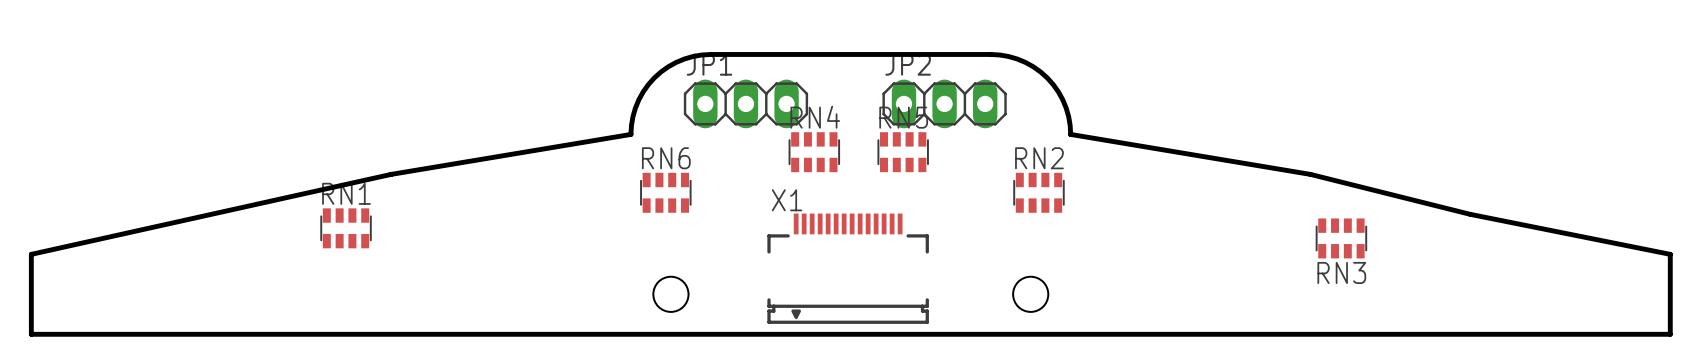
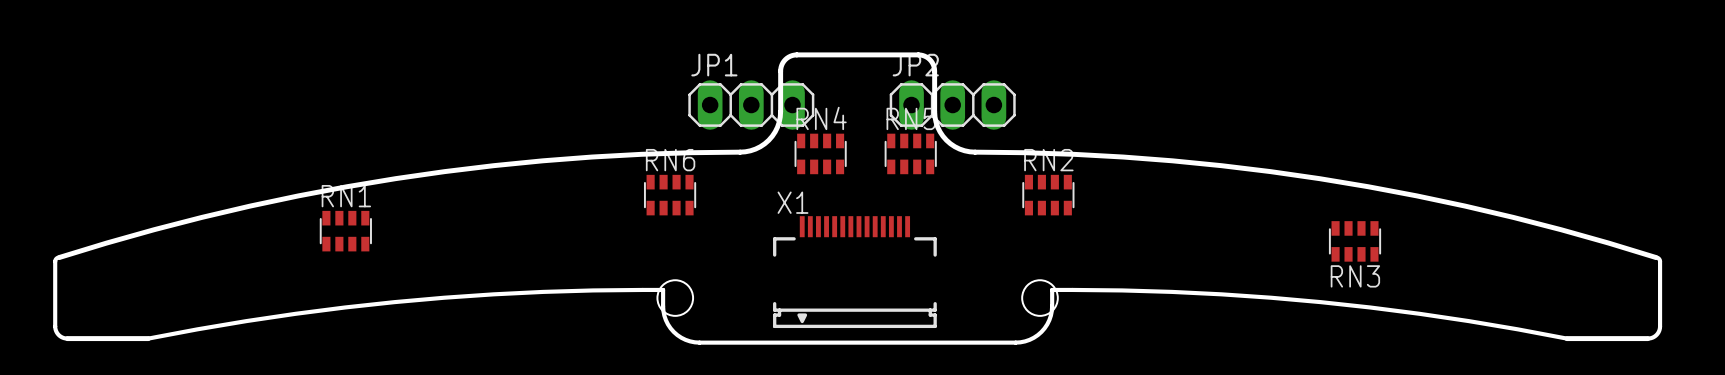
board edge: (790, 54) (701, 54) (676, 62) (661, 71) (643, 91) (635, 108) (630, 134) (391, 174) (31, 254) (31, 334) (71, 334) -> (796, 54) (786, 58) (781, 66) (780, 111) (777, 127) (768, 140) (750, 150) (641, 154) (542, 160) (395, 178) (250, 206) (154, 229) (57, 257) (55, 261) (55, 328) (59, 336) (67, 338)
board edge: (910, 54) (999, 54) (1025, 62) (1040, 71) (1058, 91) (1066, 108) (1070, 134) (1310, 174) (1470, 214) (1670, 254) (1670, 334) (1630, 334) -> (918, 54) (928, 58) (934, 66) (934, 111) (937, 127) (946, 140) (964, 150) (1073, 154) (1172, 160) (1319, 178) (1465, 206) (1561, 229) (1657, 257) (1660, 261) (1659, 328) (1655, 336) (1647, 338)
board edge: (151, 334) (1550, 334) -> (148, 338) (246, 321) (394, 302) (493, 294) (642, 289) (663, 289) (663, 310) (670, 328) (681, 337) (699, 342) (1020, 342) (1033, 337) (1047, 324) (1051, 310) (1052, 289) (1171, 291) (1320, 302) (1468, 321) (1566, 338)

